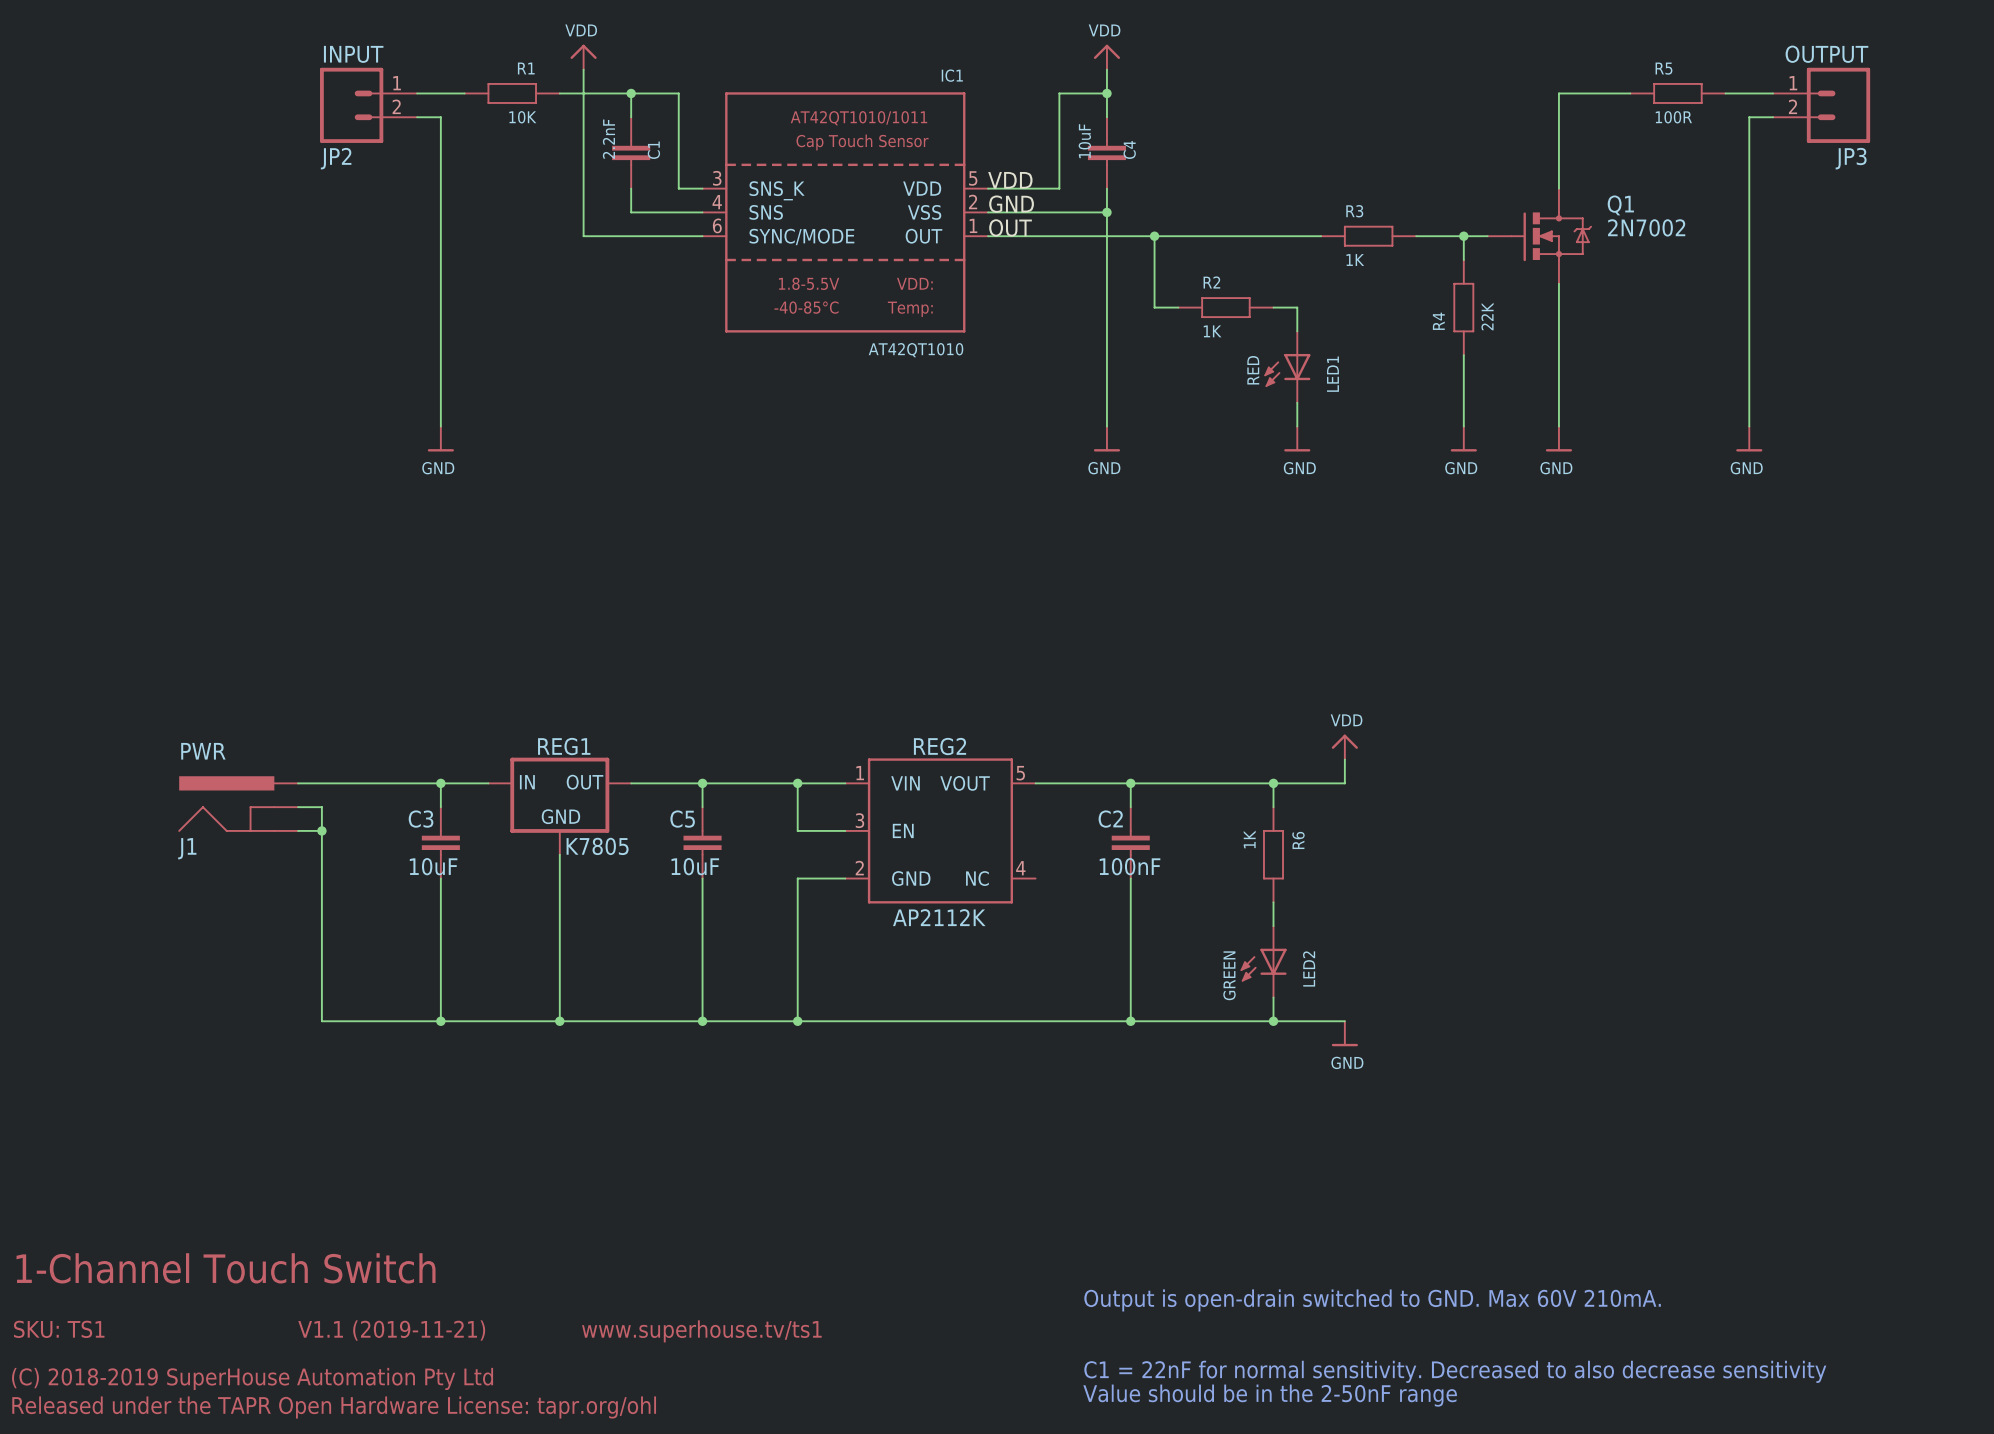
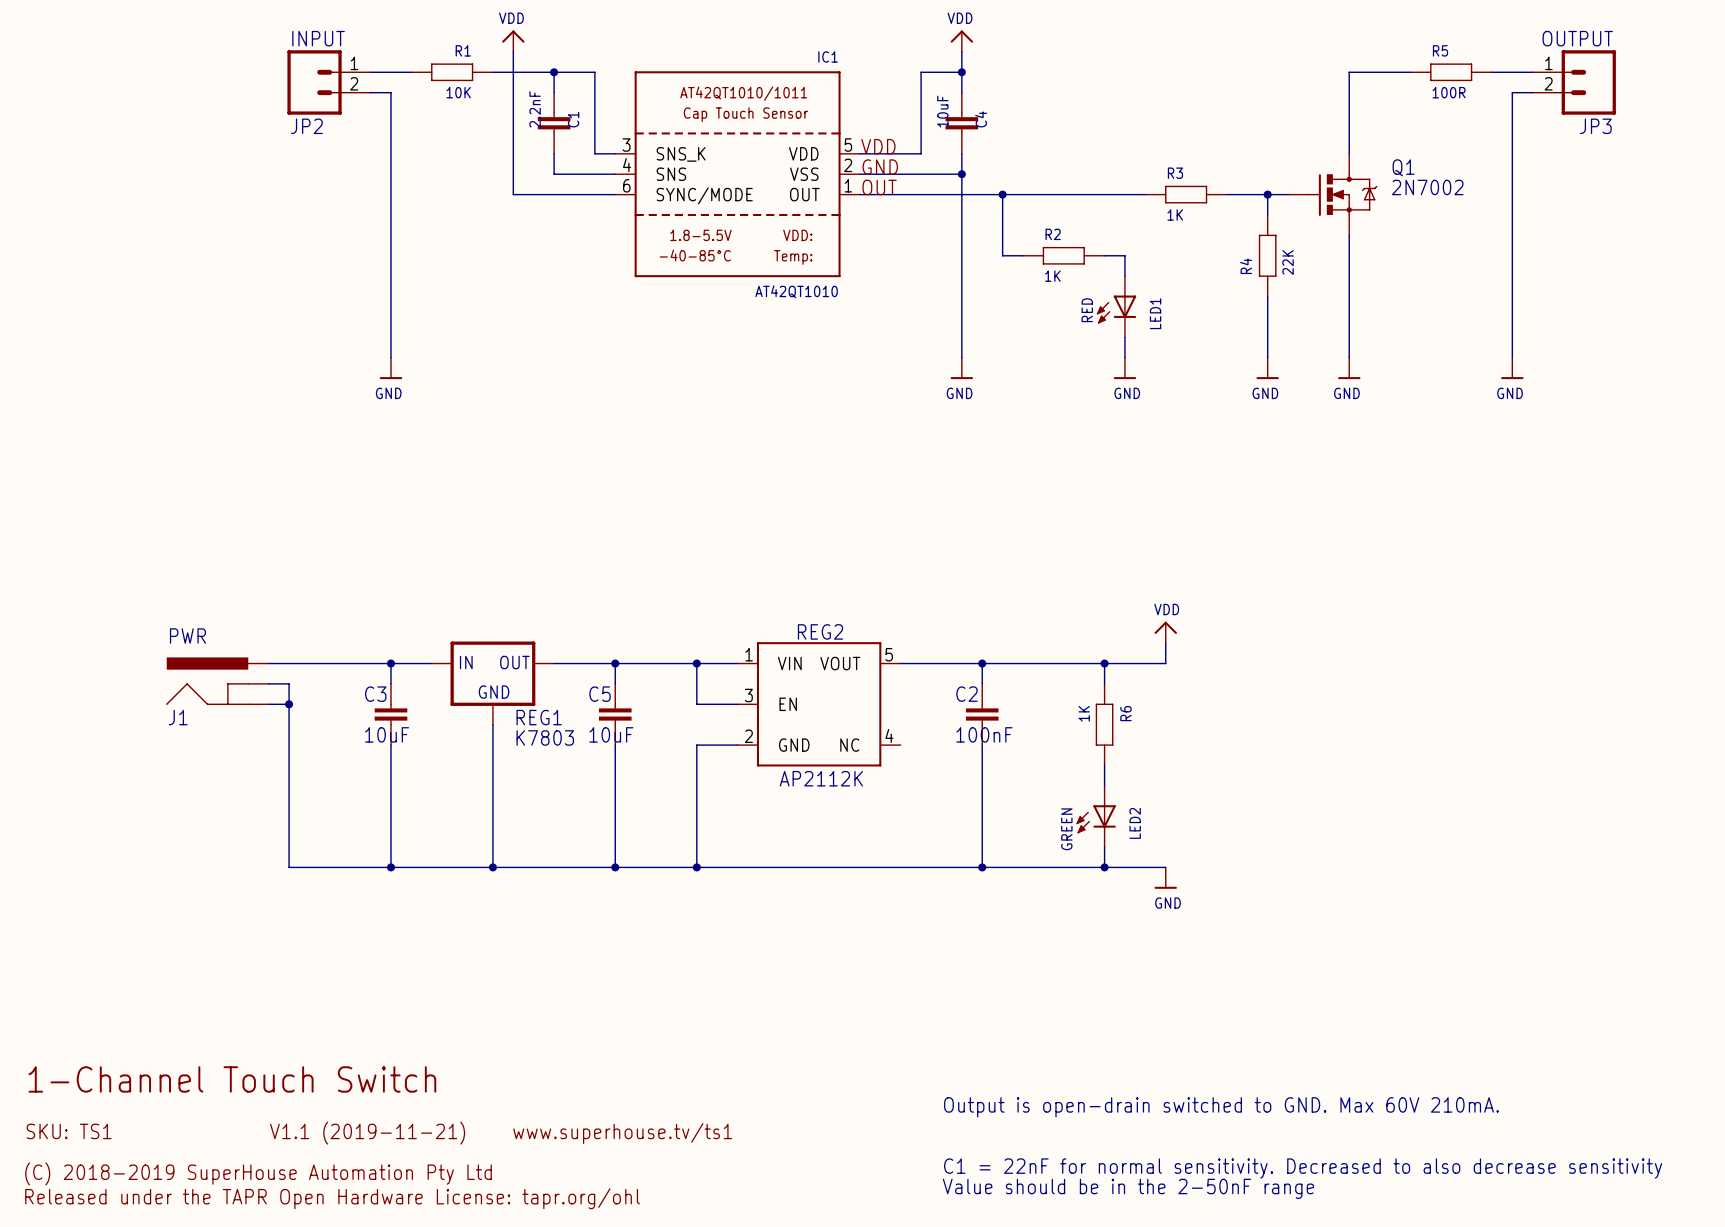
REG1 name position: REG1 (564, 746) -> REG1 (539, 717)
REG1 value: K7805 (597, 846) -> K7803 (545, 737)

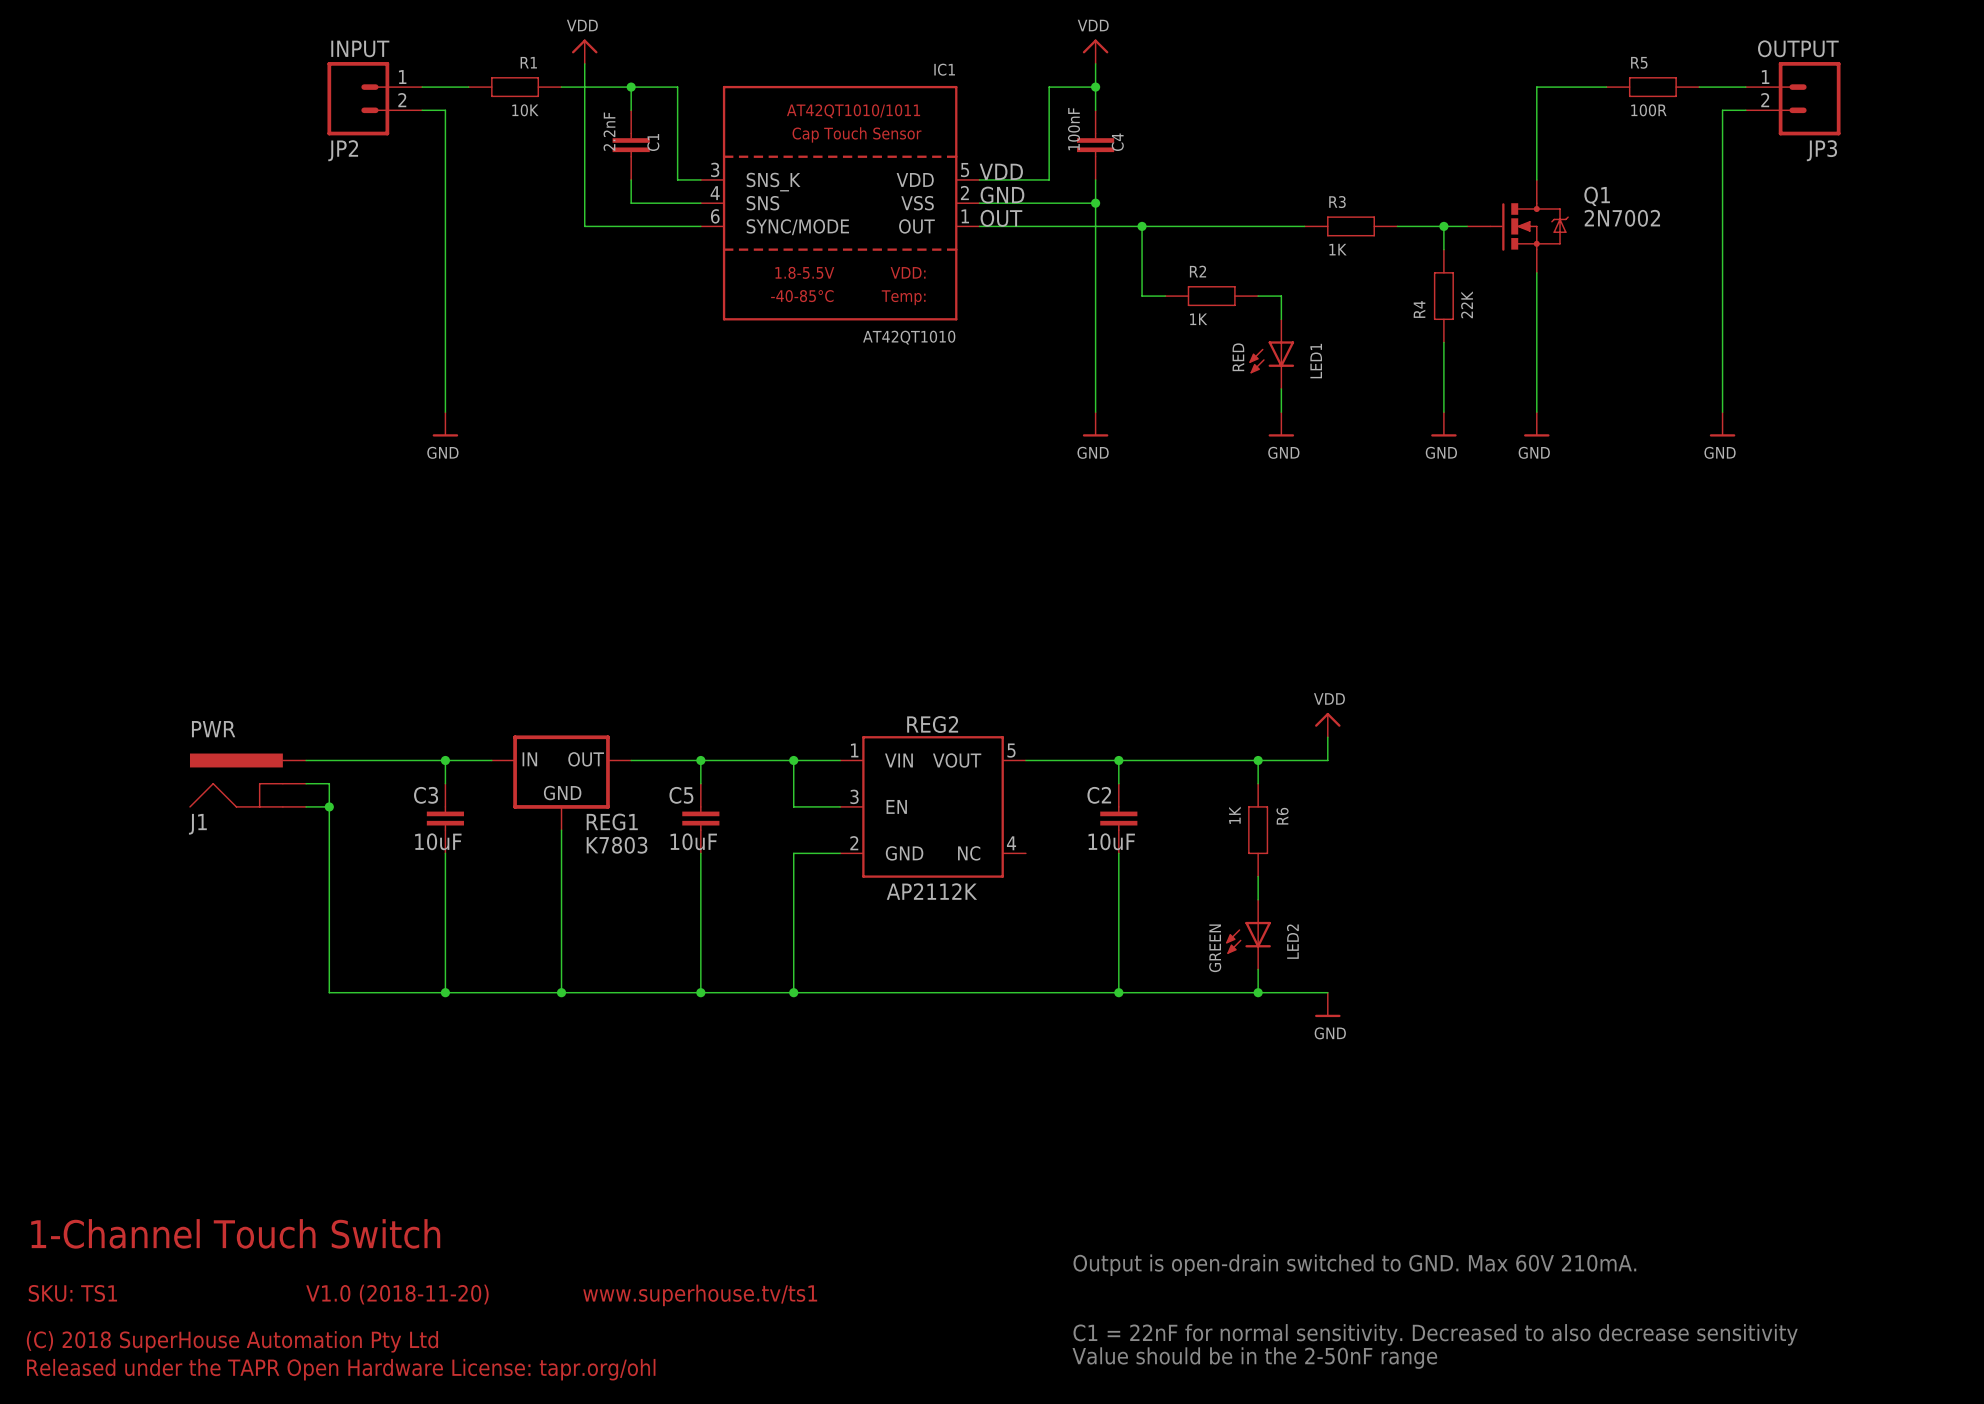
C4 value: 10uF (942, 111) -> 100nF (1073, 129)
C2 value: 100nF (984, 734) -> 10uF (1111, 841)
text: V1.1 (2019-11-21) (367, 1133) -> V1.0 (2018-11-20) (397, 1294)
text: (C) 2018-2019 SuperHouse Automation Pty Ltd (258, 1173) -> (C) 2018 SuperHouse Automation Pty Ltd (232, 1341)

